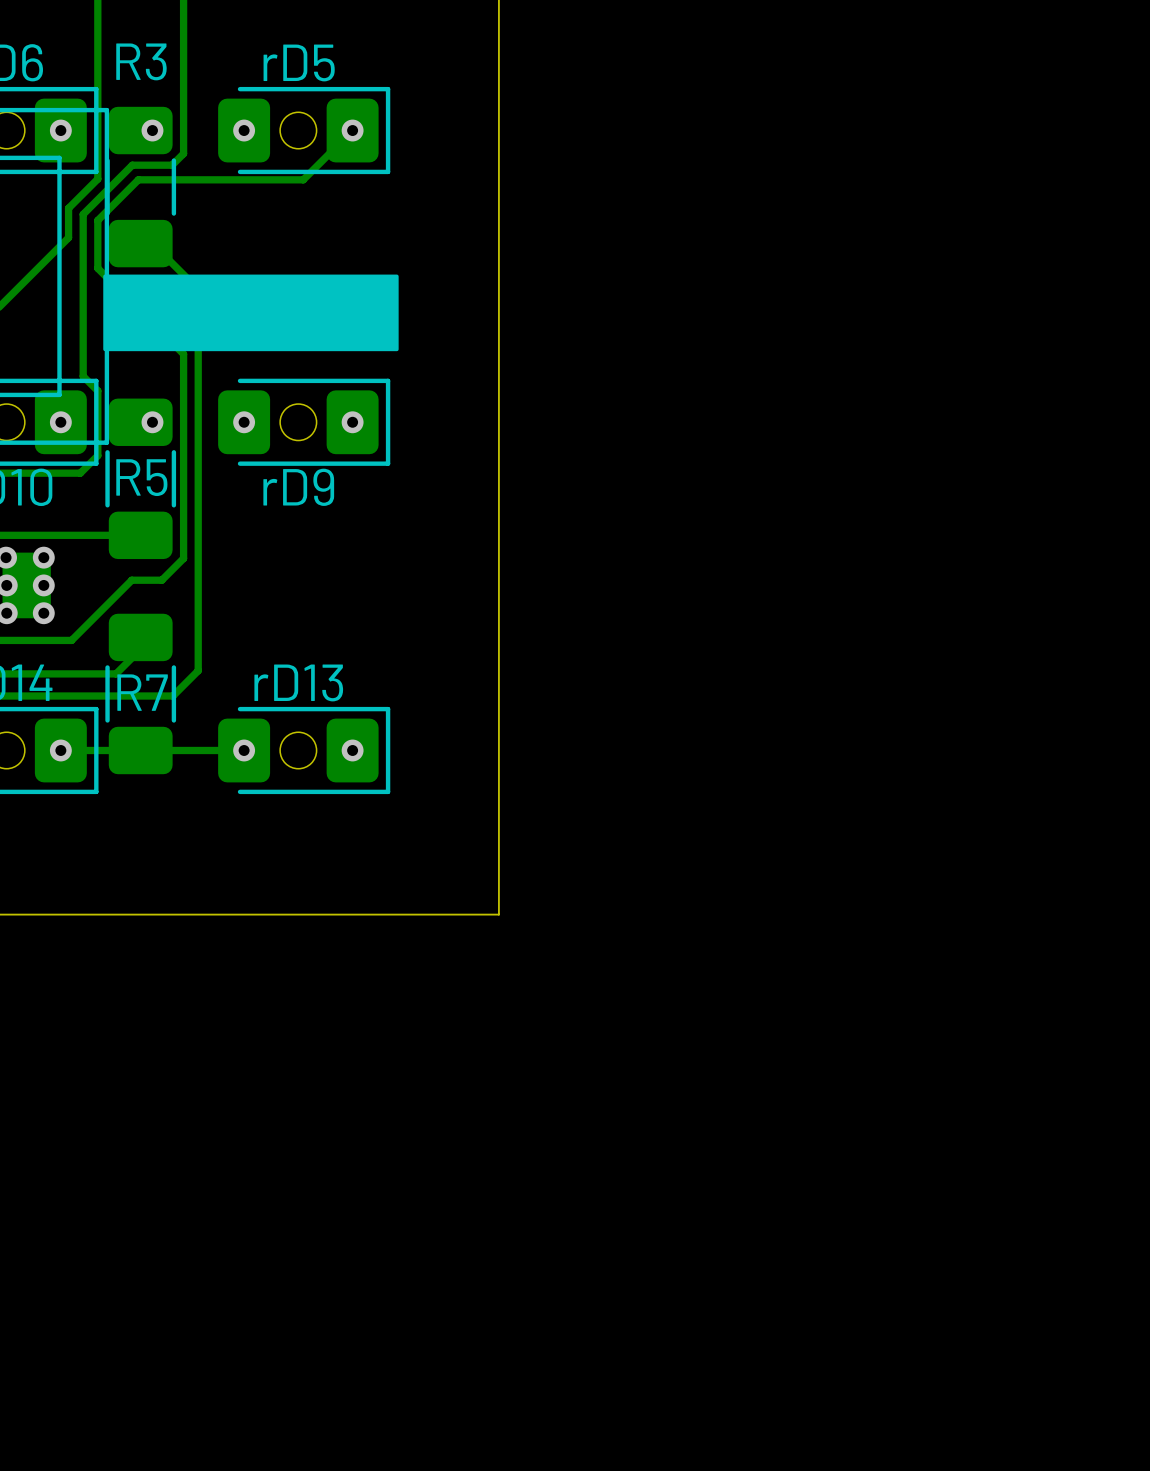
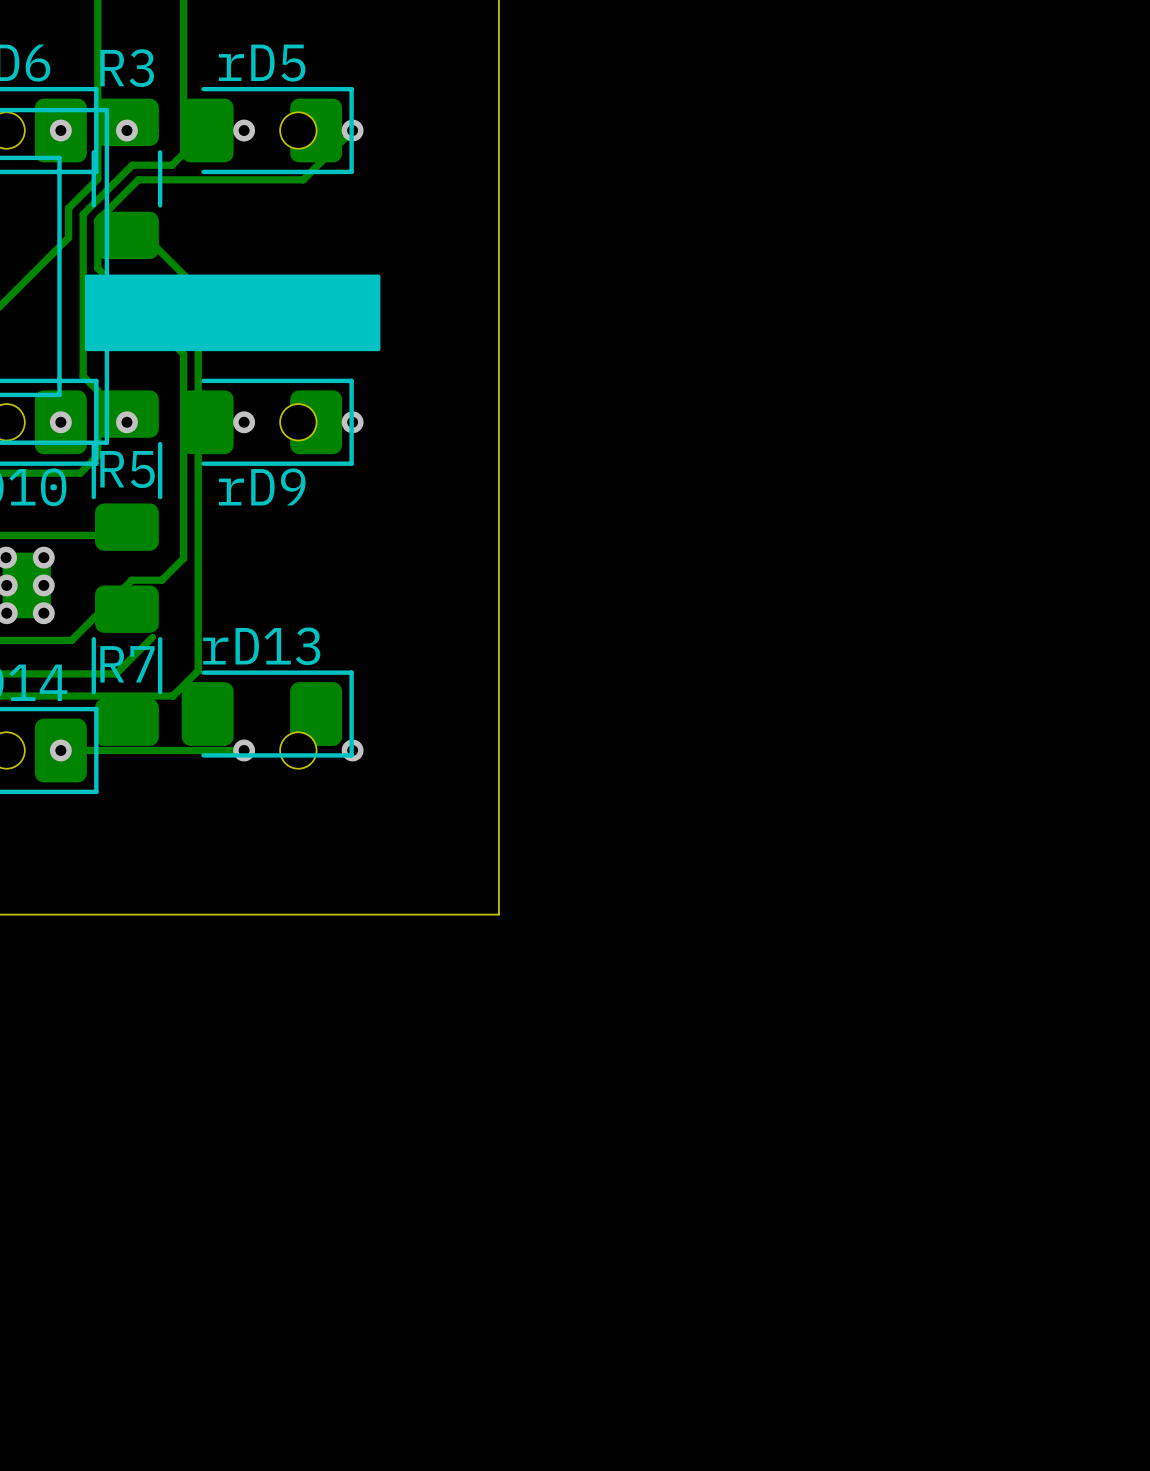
R3 name position: R3 (141, 61) -> R3 (127, 68)
via position: (152, 130) -> (126, 130)
rD5 position: (304, 130) -> (267, 130)
R3 position: (140, 187) -> (126, 178)
drawing position: (250, 312) -> (232, 312)
via position: (152, 422) -> (126, 422)
rD9 position: (304, 422) -> (267, 422)
R5 position: (140, 478) -> (126, 470)
R7 position: (140, 693) -> (126, 665)
rD13 position: (304, 750) -> (267, 714)

